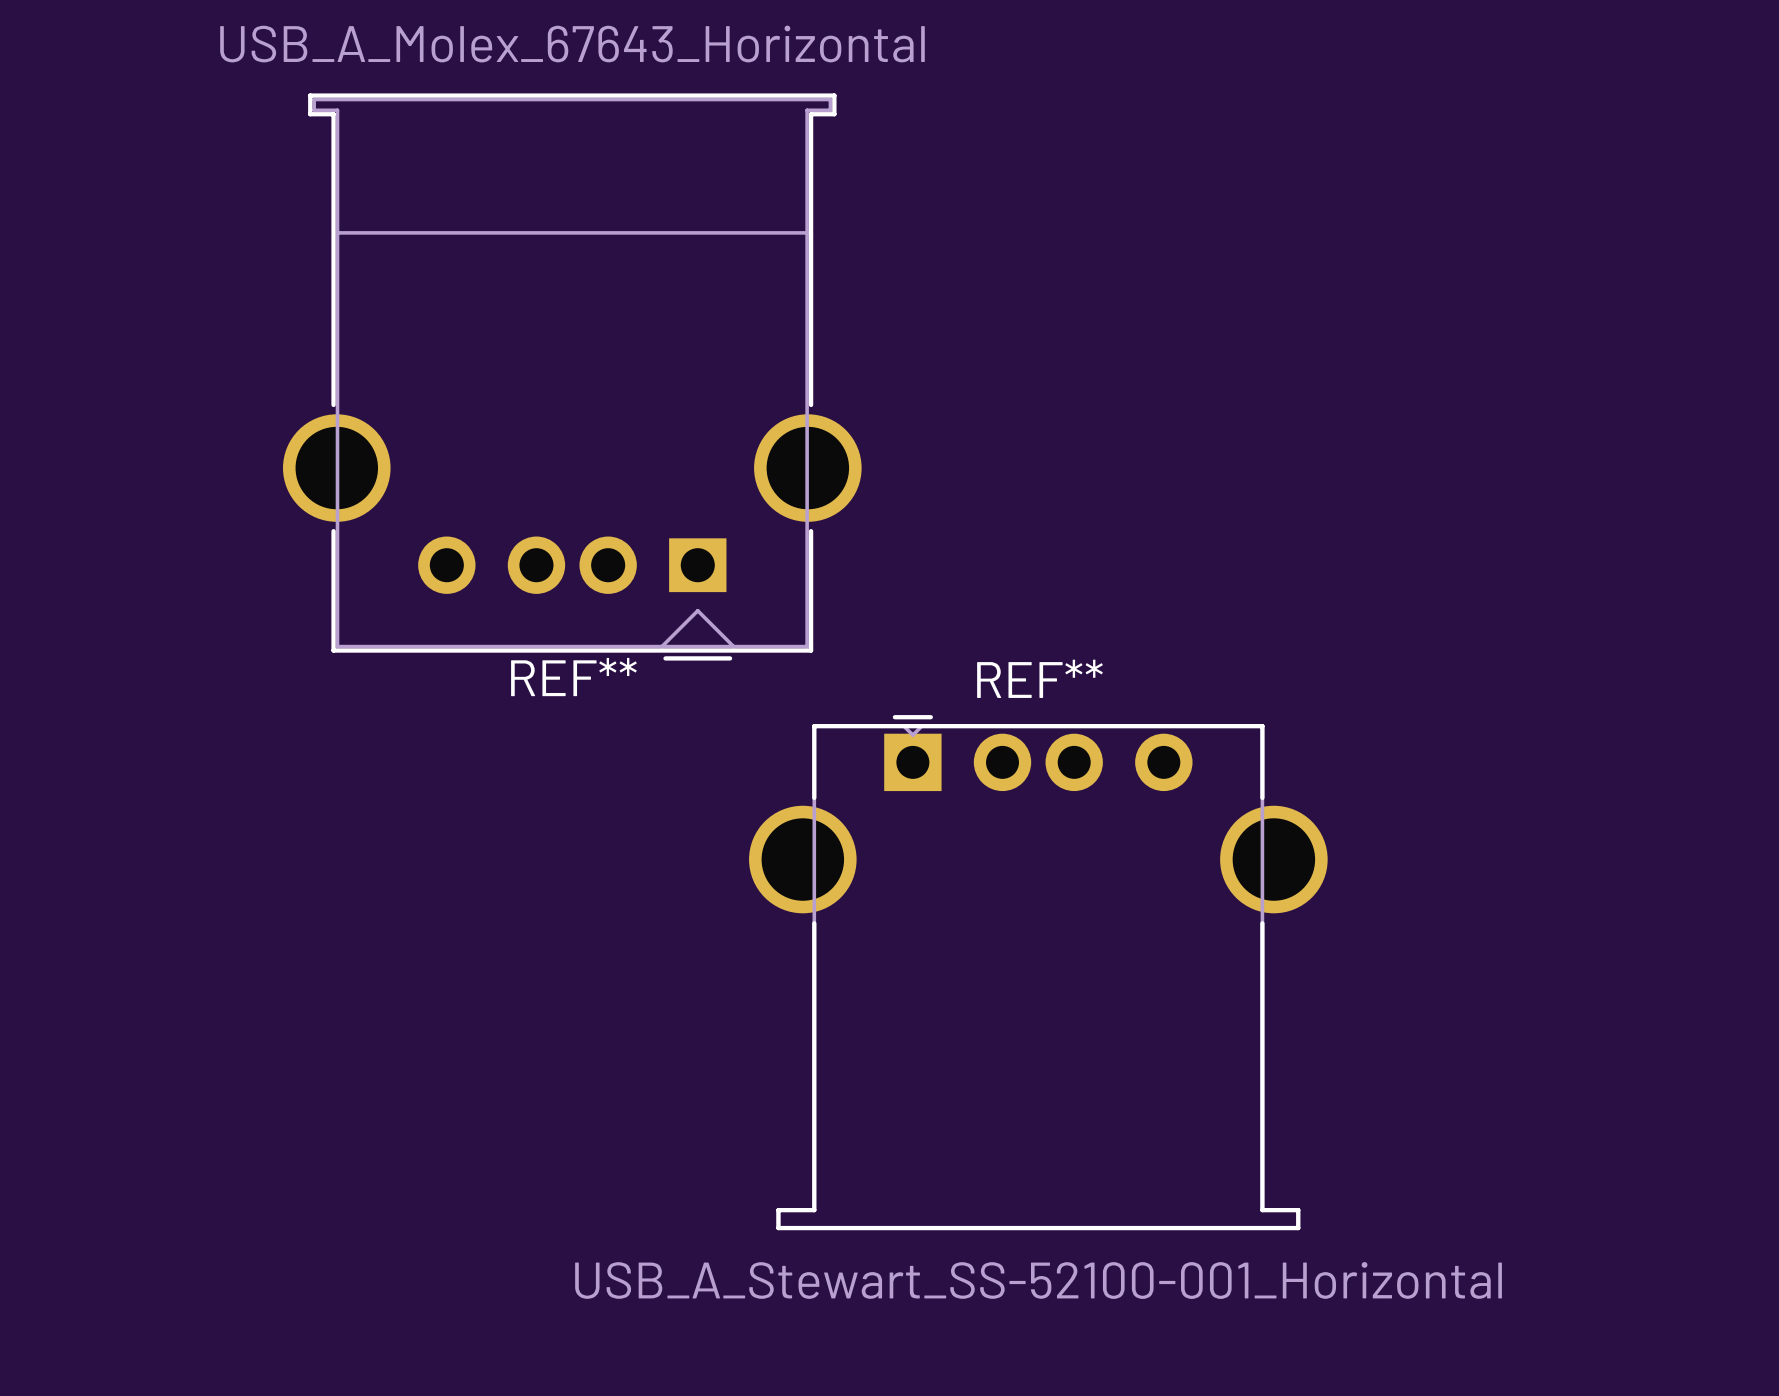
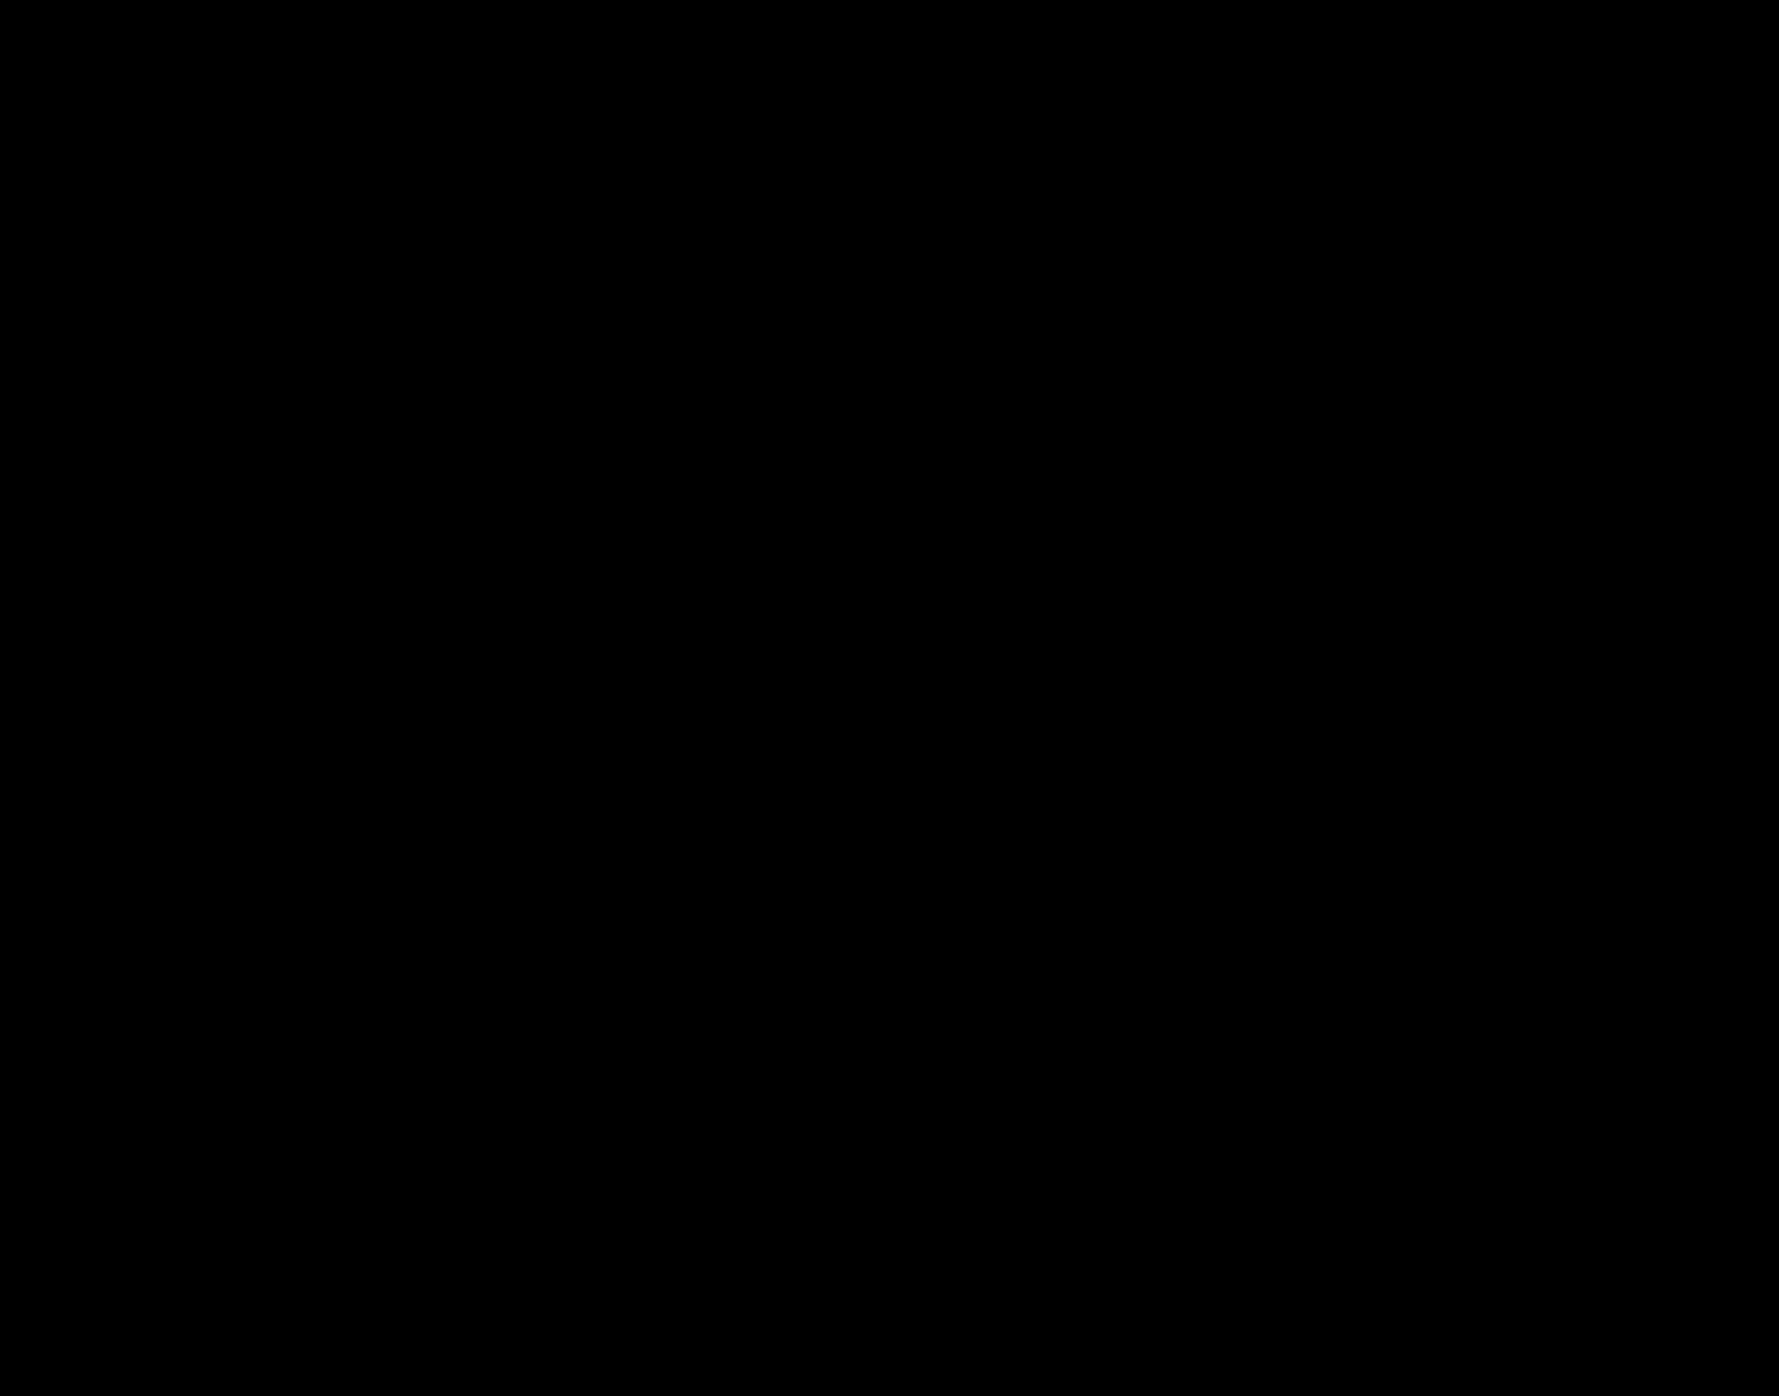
REF**: USB_A_Molex_67643_Horizontal (572, 377) -> none
REF**: USB_A_Stewart_SS-52100-001_Horizontal (1038, 972) -> none

